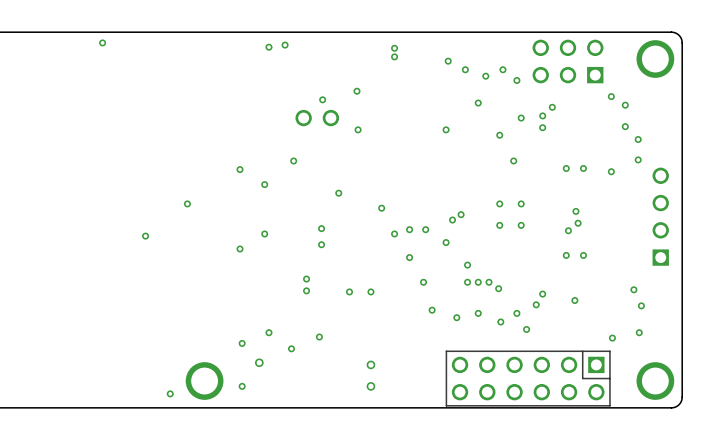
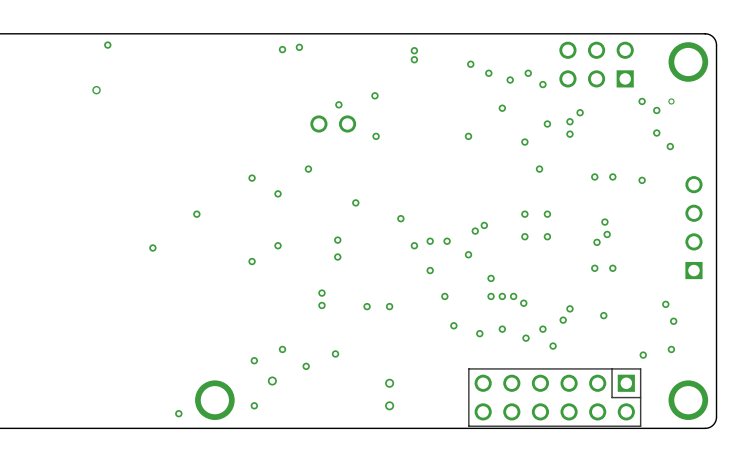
via: none -> (96, 90)
via: none -> (671, 101)
via: (638, 159) -> none

